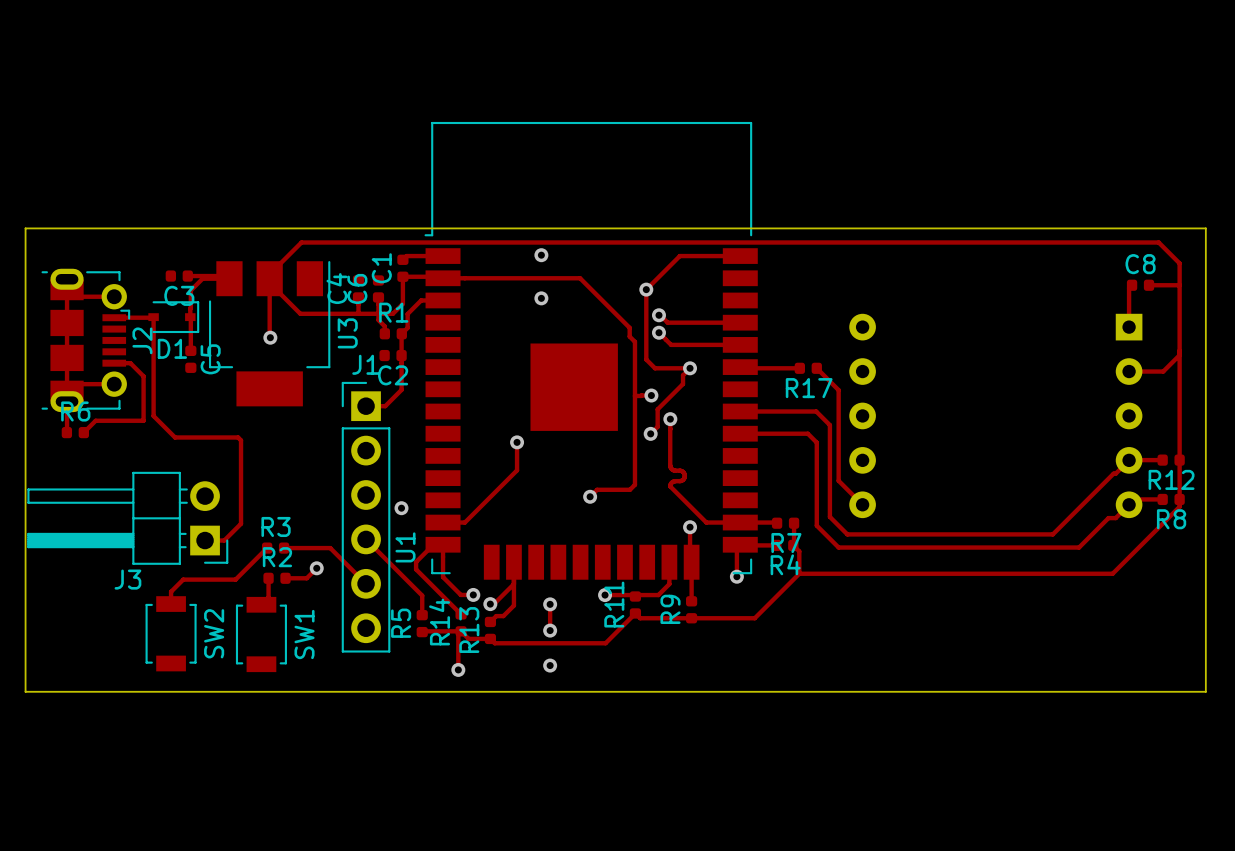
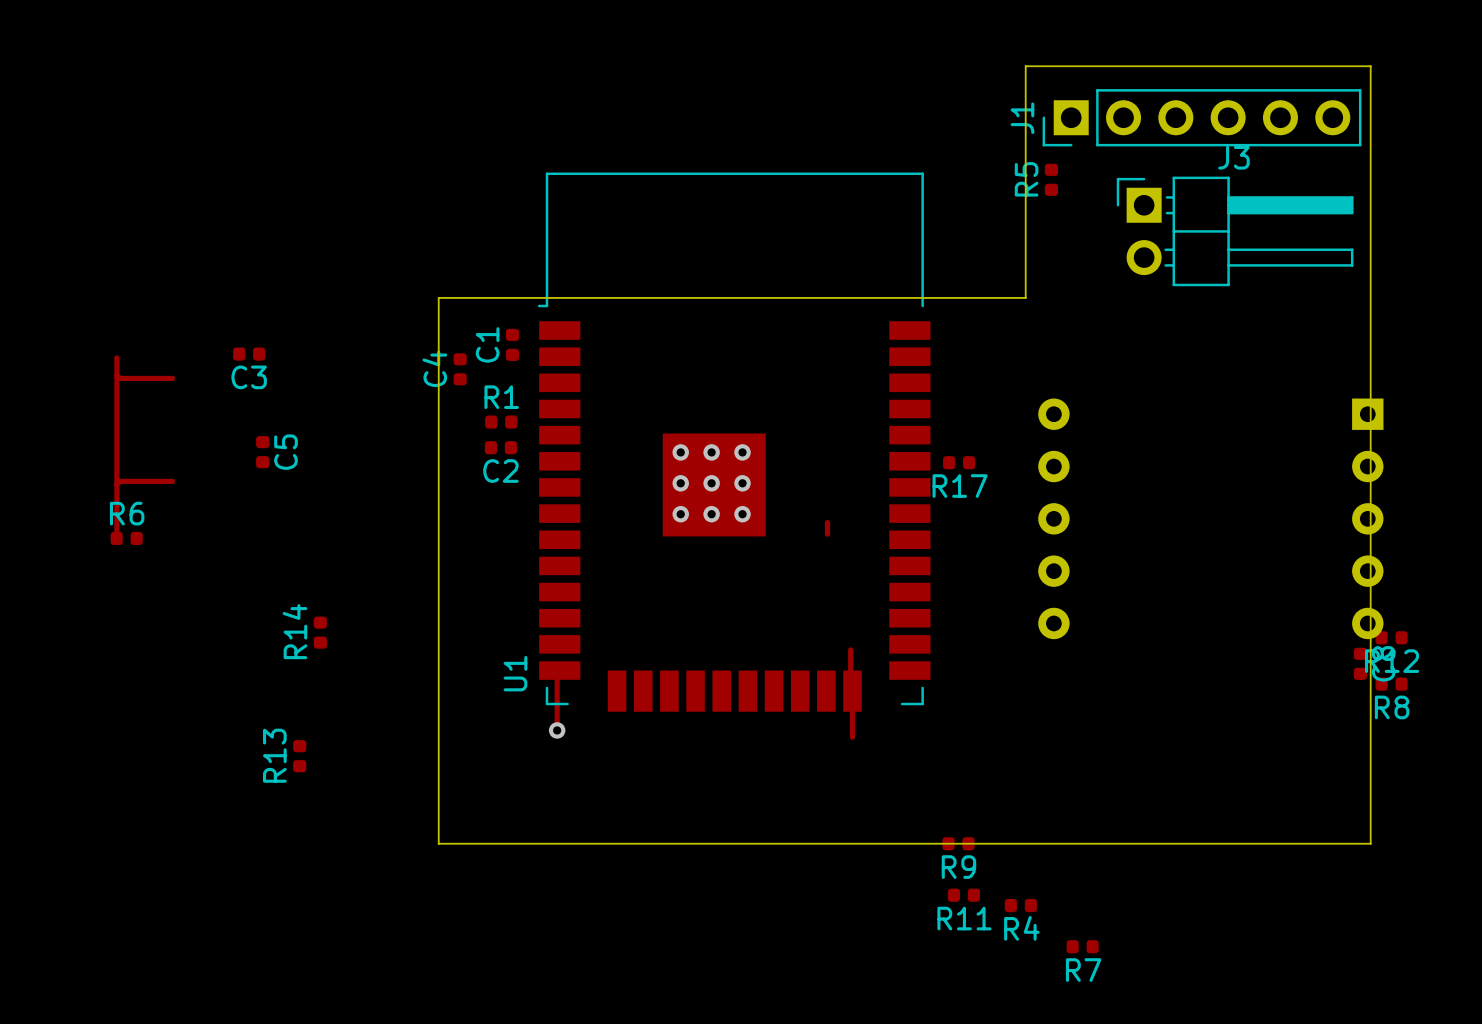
board edge: (340, 228) (25, 228) (25, 691) (340, 691) -> (438, 297) (438, 843)
board edge: (838, 228) (1205, 228) (1205, 691) (1131, 691) -> (1025, 297) (1025, 66) (1370, 66) (1370, 843)
via: (541, 255) -> none
track: (443, 256) (406, 256) (402, 259) -> none
track: (740, 256) (679, 256) (646, 289) (646, 359) (655, 368) (690, 368) (683, 375) (683, 384) (657, 409) (657, 426) (650, 433) -> none
track: (187, 276) (226, 276) (229, 278) (202, 278) (190, 290) (190, 350) -> none
track: (269, 283) (300, 313) (392, 313) (402, 303) (402, 276) (580, 278) (629, 327) (629, 336) (634, 341) (634, 484) (629, 489) (597, 489) (590, 496) -> none
track: (1132, 285) (1129, 288) (1129, 327) -> none
C8 rotation: 0° (1140, 285) -> 90° clockwise (1360, 663)
C8 position: (1140, 285) -> (1360, 663)
track: (1149, 285) (1179, 285) -> none
C6: (378, 288) -> none
via: (646, 289) -> none
track: (358, 297) (358, 313) -> none
track: (378, 297) (378, 320) (384, 326) (384, 333) -> none
via: (541, 298) -> none
track: (443, 300) (421, 300) (407, 314) (407, 327) (401, 334) (401, 389) (385, 406) (366, 406) -> none
track: (658, 315) (667, 322) (740, 322) -> none
via: (658, 315) -> none
track: (114, 317) (153, 317) (153, 416) (175, 437) (238, 437) (241, 440) (241, 523) (224, 540) (205, 540) -> none
D1: (173, 317) -> none
track: (658, 332) (671, 344) (740, 344) -> none
via: (658, 332) -> none
U3: (269, 333) -> none
track: (270, 337) (269, 274) (301, 242) (1158, 242) (1179, 263) (1179, 506) (1112, 573) (799, 573) -> none
via: (270, 337) -> none
J2: (85, 340) -> none
track: (1179, 355) (1163, 371) (1129, 371) -> none
via: none -> (680, 452)
via: none -> (711, 452)
via: none -> (742, 452)
track: (114, 363) (130, 363) (143, 376) (143, 420) (95, 420) (83, 432) -> none
track: (740, 367) (799, 368) -> none
via: (690, 368) -> none
R17 position: (808, 368) -> (959, 462)
track: (816, 368) (838, 390) (838, 480) (862, 504) -> none
via: none -> (680, 483)
via: none -> (711, 483)
via: none -> (742, 483)
track: (651, 395) (634, 395) -> none
via: (651, 395) -> none
track: (740, 411) (816, 411) (829, 425) (829, 516) (847, 534) (1052, 534) (1129, 460) (1162, 460) -> none
via: none -> (680, 514)
via: none -> (711, 514)
via: none -> (742, 514)
via: (670, 419) -> none
track: (670, 429) (670, 466) (673, 470) (682, 471) (684, 475) (681, 480) (672, 482) (670, 486) (706, 522) (777, 523) -> none
via: (650, 433) -> none
track: (740, 433) (807, 433) (816, 442) (816, 525) (838, 547) (1079, 547) (1108, 518) (1115, 518) (1134, 499) (1162, 499) -> none
track: (517, 442) (517, 470) (464, 522) (443, 522) -> none
via: (517, 442) -> none
R12 position: (1171, 460) -> (1391, 637)
via: (590, 496) -> none
R8 position: (1171, 499) -> (1391, 684)
via: (401, 508) -> none
J1 rotation: 0° (366, 517) -> 90° counterclockwise (1202, 117)
J1 position: (366, 517) -> (1202, 117)
J3 rotation: 0° (127, 518) -> 180° (1235, 231)
J3 position: (127, 518) -> (1235, 231)
R7 position: (785, 523) -> (1082, 946)
track: (794, 523) (793, 545) (799, 551) (799, 573) -> none
via: (690, 527) -> none
track: (366, 539) (422, 595) (422, 615) -> none
track: none -> (559, 670) (557, 673) (557, 730)
track: (776, 545) (740, 544) (736, 548) (736, 576) -> none
R4 position: (784, 545) -> (1020, 905)
track: (267, 548) (235, 579) (183, 579) (171, 591) (171, 604) -> none
R3: (275, 548) -> none
track: (284, 548) (330, 548) (366, 583) -> none
track: (513, 562) (513, 605) (503, 616) (496, 616) (490, 621) -> none
track: (669, 562) (669, 584) (658, 595) (605, 595) -> none
track: (316, 568) (306, 578) (285, 578) -> none
via: (316, 568) -> none
track: (799, 573) (754, 618) (640, 618) (635, 613) (605, 643) (494, 643) (490, 638) (468, 638) (461, 631) -> none
via: (736, 576) -> none
track: (268, 578) (268, 597) (261, 604) -> none
R2: (277, 578) -> none
track: (513, 584) (493, 604) (490, 604) -> none
track: (473, 594) (460, 594) (443, 577) (443, 544) (433, 544) (416, 562) (416, 569) (461, 614) -> none
via: (473, 594) -> none
via: none -> (557, 730)
via: (605, 595) -> none
via: (490, 604) -> none
track: (550, 604) (550, 630) -> none
via: (550, 604) -> none
R11 rotation: 0° (635, 604) -> 90° clockwise (963, 895)
R11 position: (635, 604) -> (963, 895)
R9 rotation: 0° (691, 609) -> 90° clockwise (958, 843)
R9 position: (691, 609) -> (958, 843)
R14 position: (461, 622) -> (320, 632)
R5 position: (422, 623) -> (1051, 179)
R13 position: (490, 630) -> (299, 756)
via: (550, 630) -> none
track: (461, 631) (422, 632) -> none
track: (461, 631) (458, 634) (458, 669) -> none
SW2: (171, 633) -> none
SW1: (261, 634) -> none
via: (550, 665) -> none
via: (458, 669) -> none

